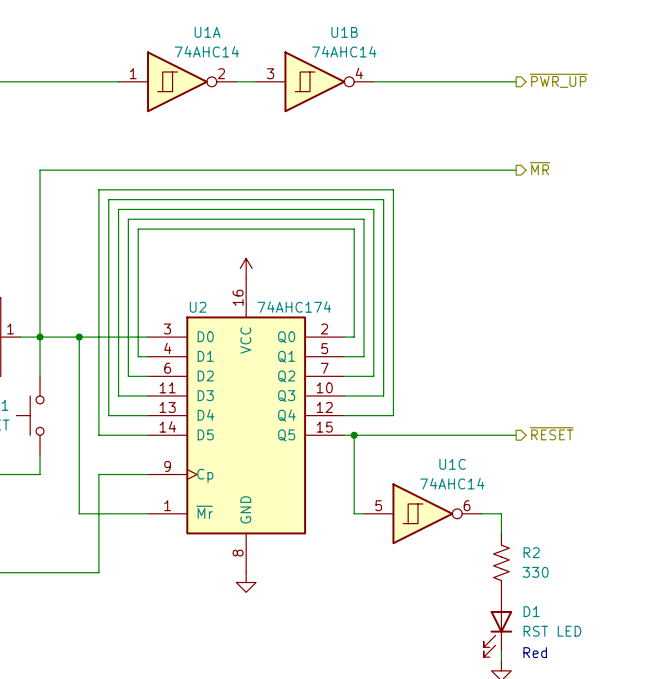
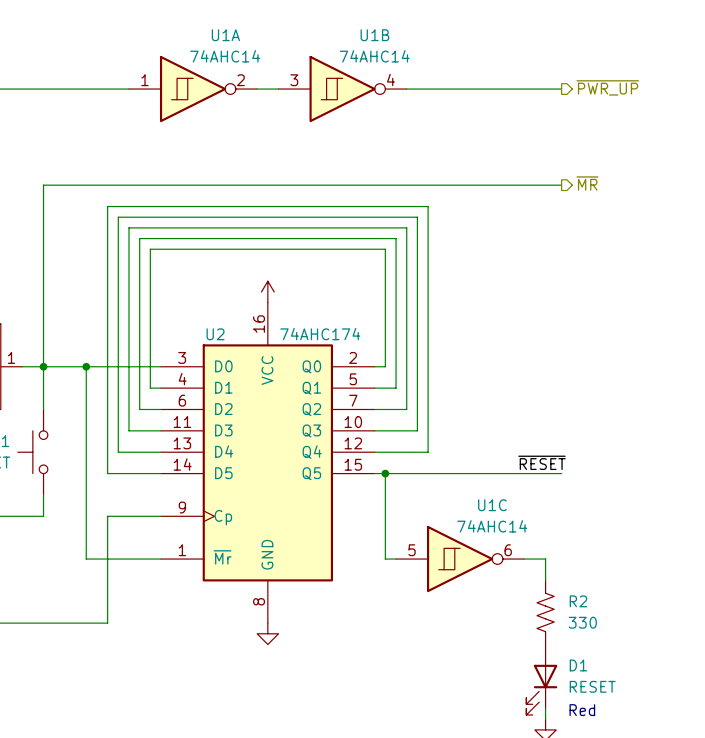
label: none -> ~{RESET} (541, 462)
hierarchical label: ~{RESET} (551, 433) -> none
D1 value: RST LED (552, 631) -> RESET (592, 686)

